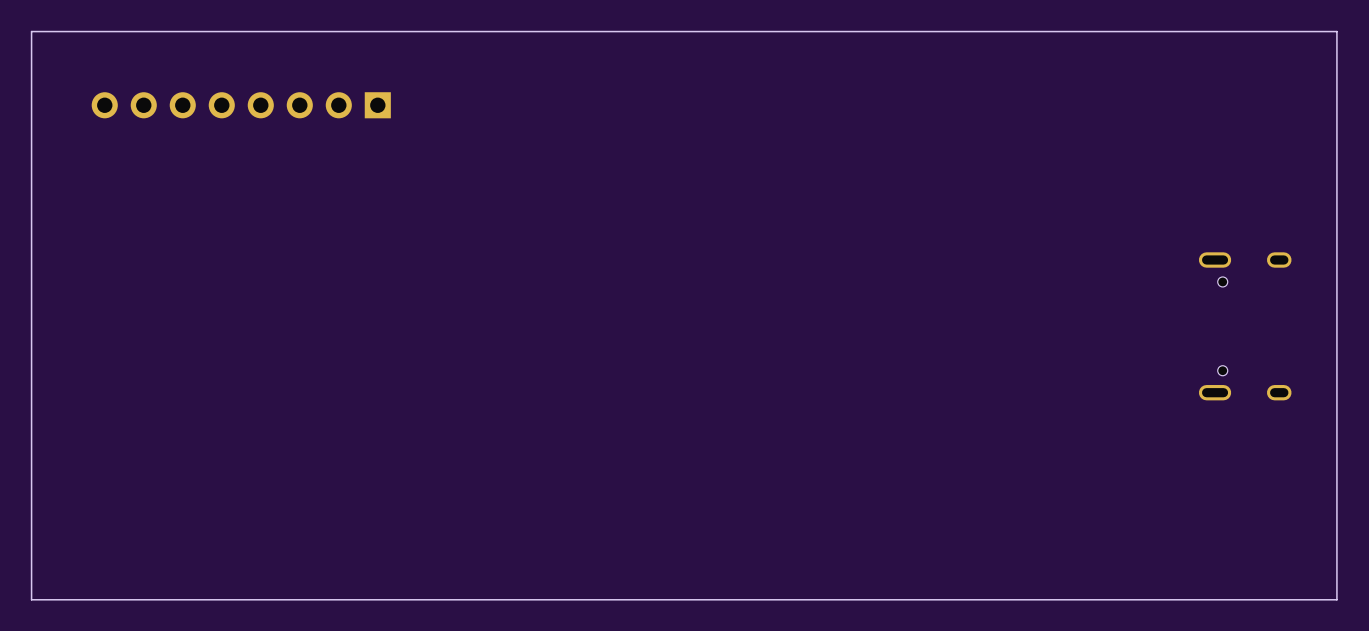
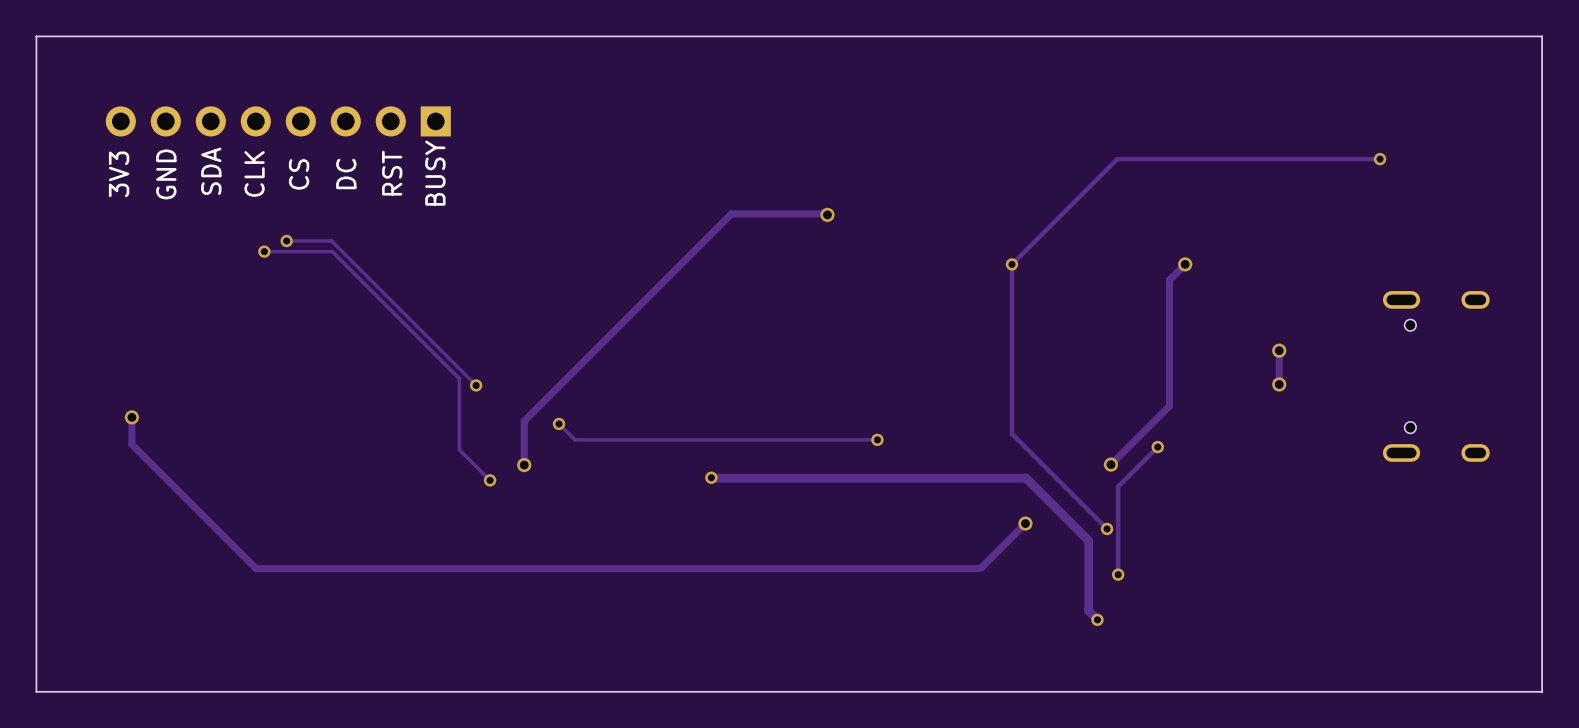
track: none -> (1380, 159) (1117, 159) (1011, 264) (1011, 433) (1107, 528)
via: none -> (1380, 159)
text: none -> SDA (211, 171)
text: none -> CLK (254, 173)
text: none -> DC (346, 173)
text: none -> RST (392, 173)
text: none -> BUSY (435, 173)
text: none -> 3V3 (119, 174)
text: none -> GND (166, 174)
text: none -> CS (299, 174)
track: none -> (827, 214) (731, 214) (524, 421) (524, 465)
via: none -> (827, 214)
track: none -> (286, 240) (331, 240) (476, 385)
via: none -> (286, 240)
track: none -> (264, 251) (332, 251) (459, 378) (459, 449) (490, 480)
via: none -> (264, 251)
via: none -> (1011, 264)
track: none -> (1185, 264) (1169, 280) (1169, 406) (1110, 464)
via: none -> (1185, 264)
track: none -> (1279, 350) (1279, 384)
via: none -> (1279, 350)
via: none -> (1279, 384)
via: none -> (476, 385)
track: none -> (131, 417) (131, 444) (256, 568) (980, 568) (1025, 523)
via: none -> (131, 417)
track: none -> (559, 423) (574, 439) (877, 439)
via: none -> (559, 423)
via: none -> (877, 439)
track: none -> (1157, 447) (1118, 486) (1118, 574)
via: none -> (1157, 447)
via: none -> (1110, 464)
via: none -> (524, 465)
track: none -> (711, 477) (1025, 478) (1088, 540) (1088, 611) (1097, 619)
via: none -> (711, 477)
via: none -> (490, 480)
via: none -> (1025, 523)
via: none -> (1107, 528)
via: none -> (1118, 574)
via: none -> (1097, 619)

